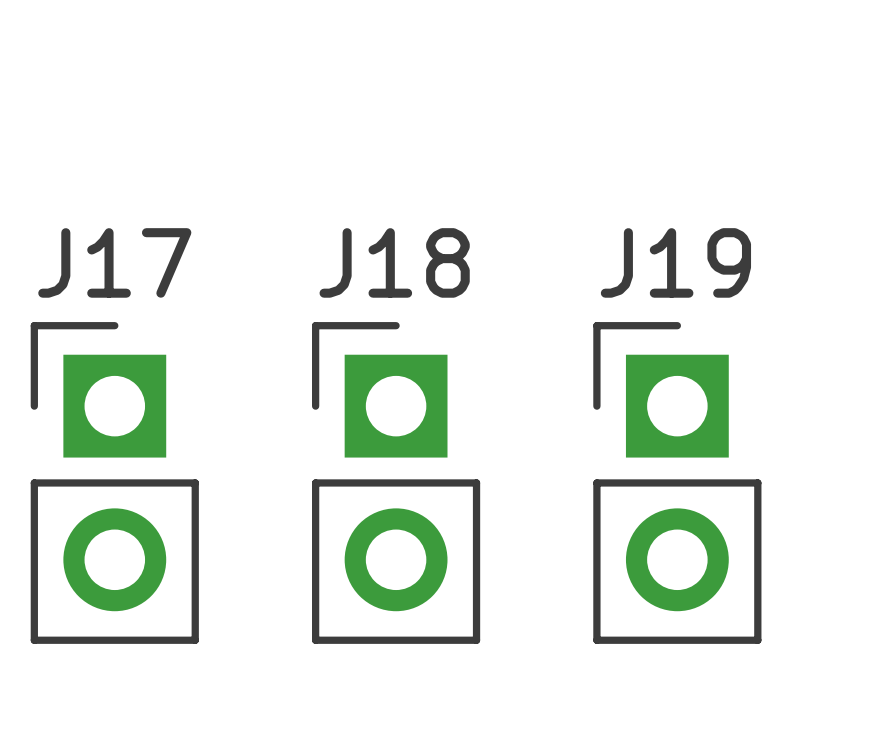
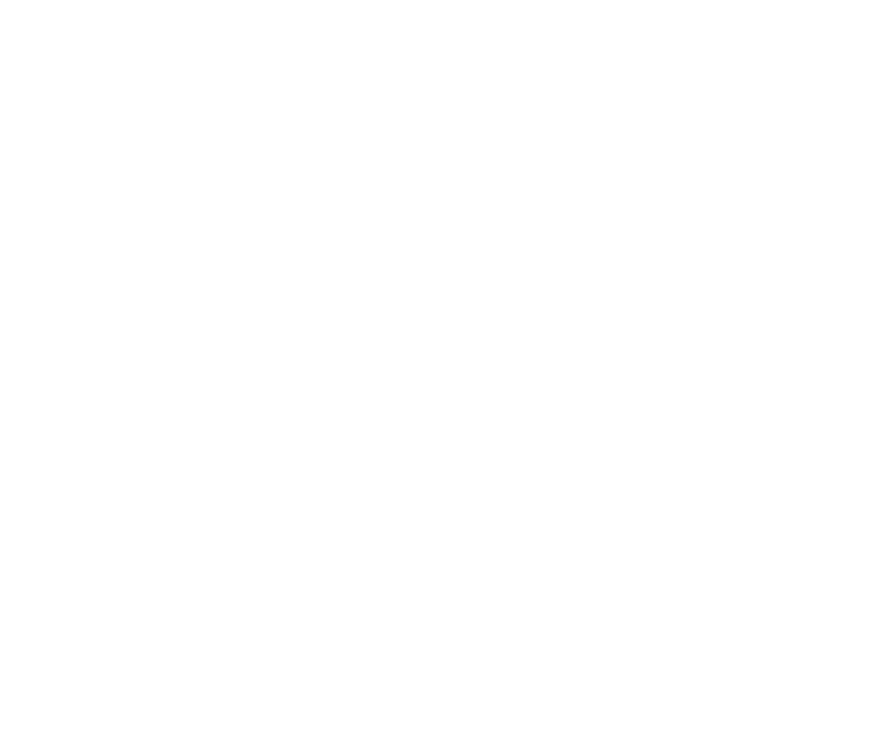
J17: (114, 482) -> none
J18: (396, 482) -> none
J19: (677, 482) -> none

